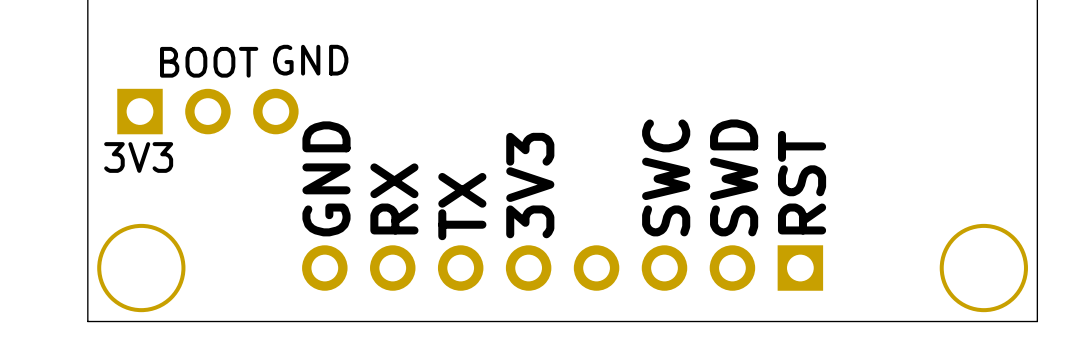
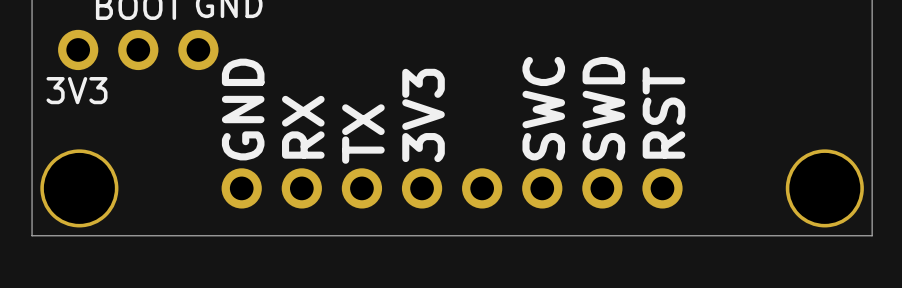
part footprint: [117, 88, 299, 135] -> [58, 29, 219, 71]
part footprint: [302, 245, 824, 291] -> [221, 168, 683, 209]

